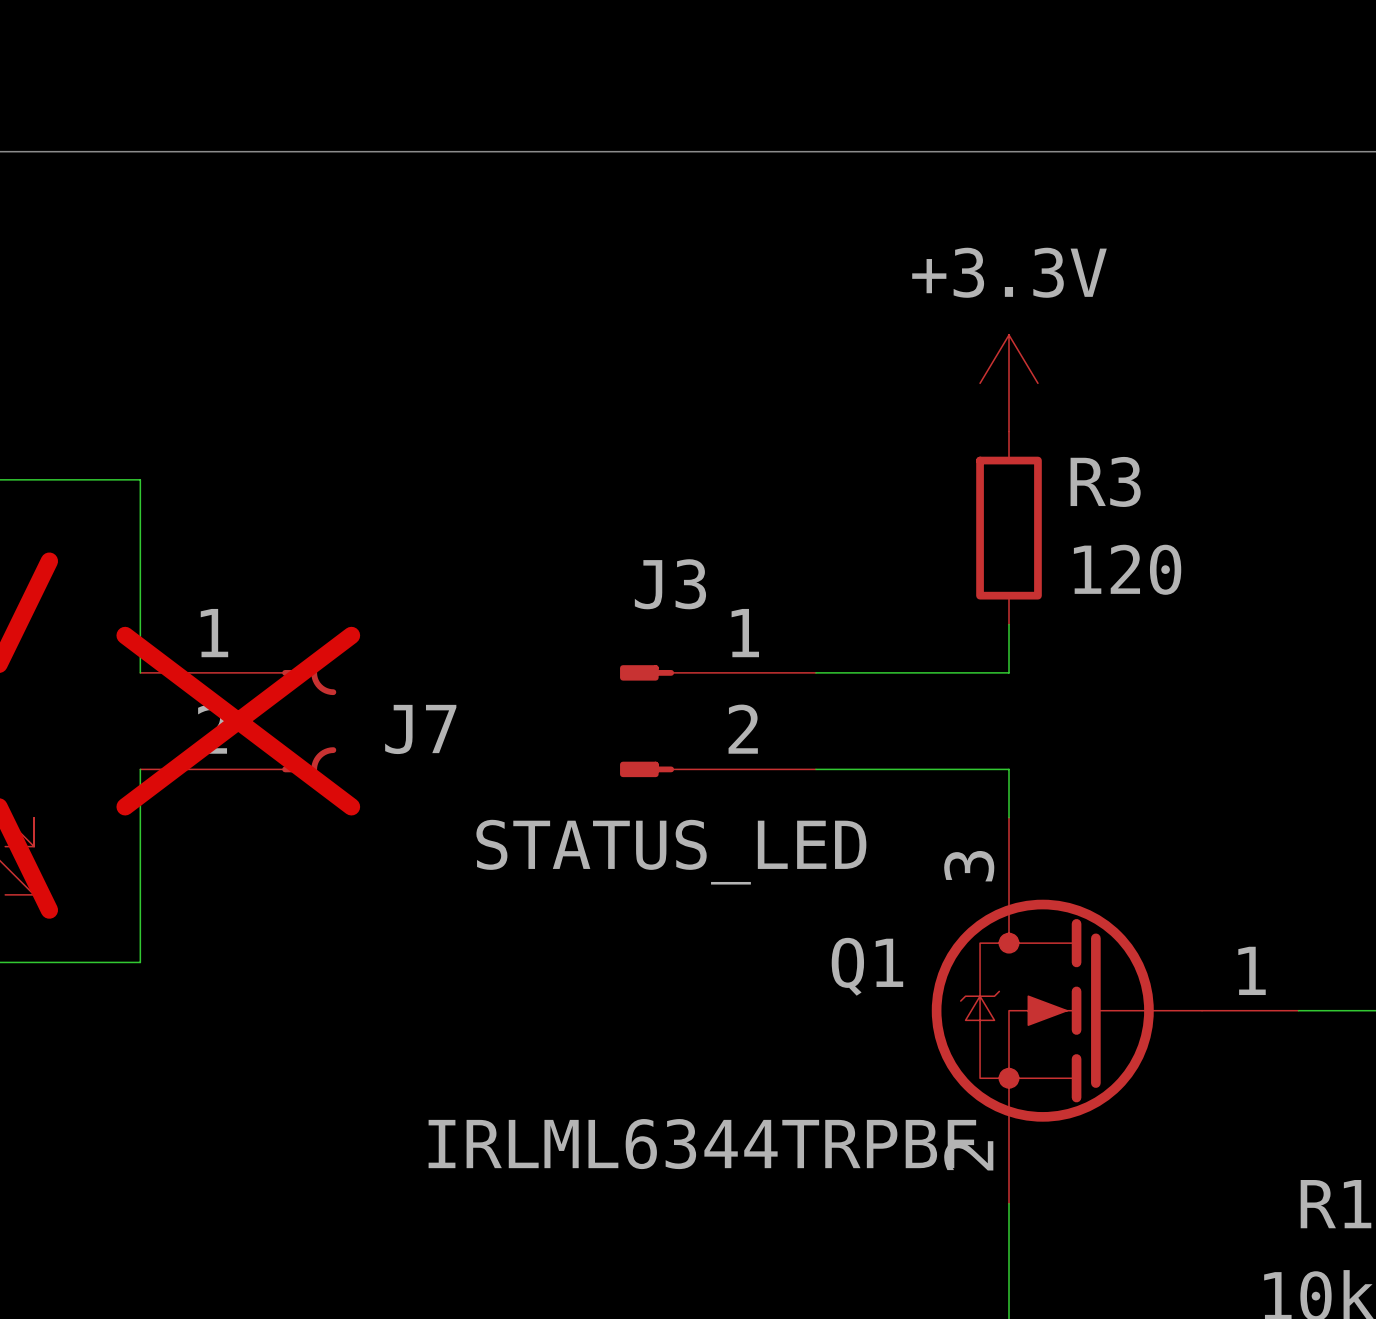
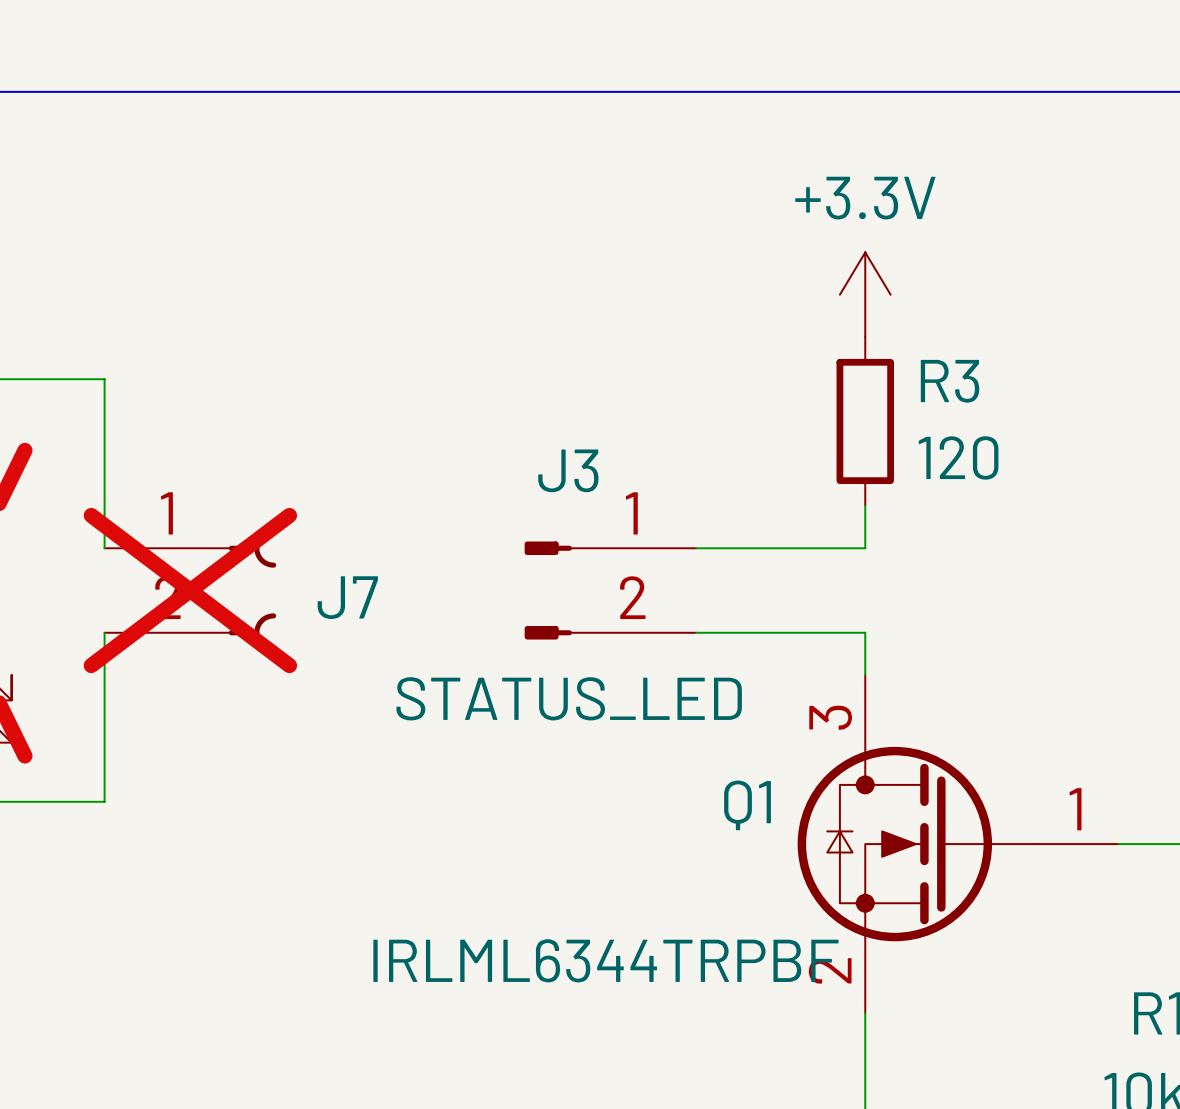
Q1 symbol: [931, 817, 1299, 1204] -> [797, 675, 1119, 1014]

